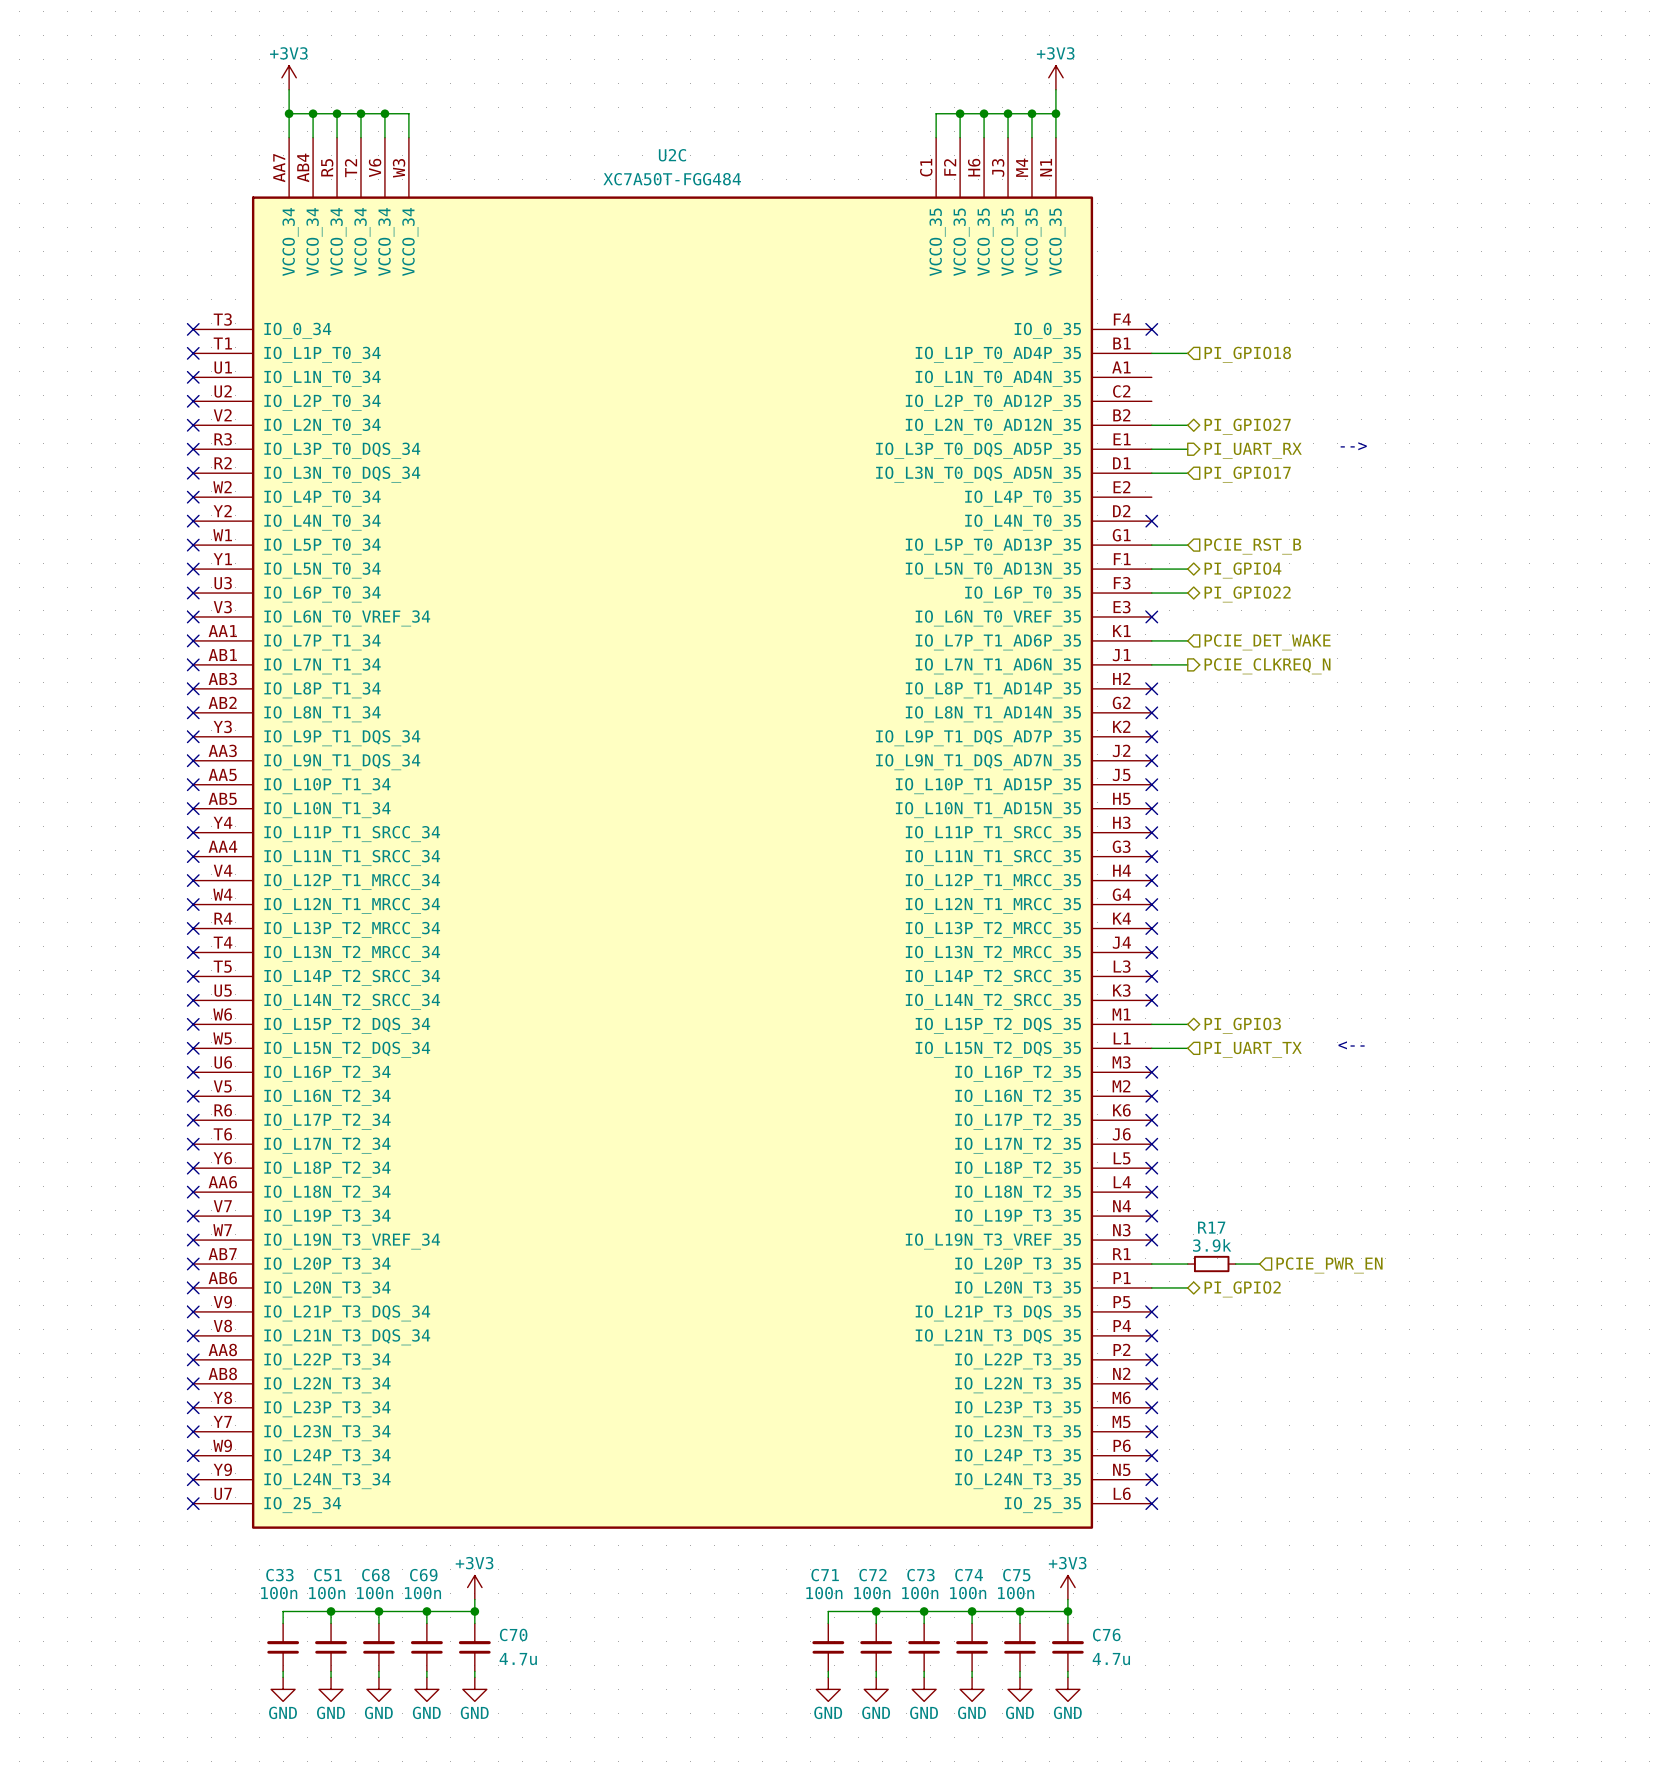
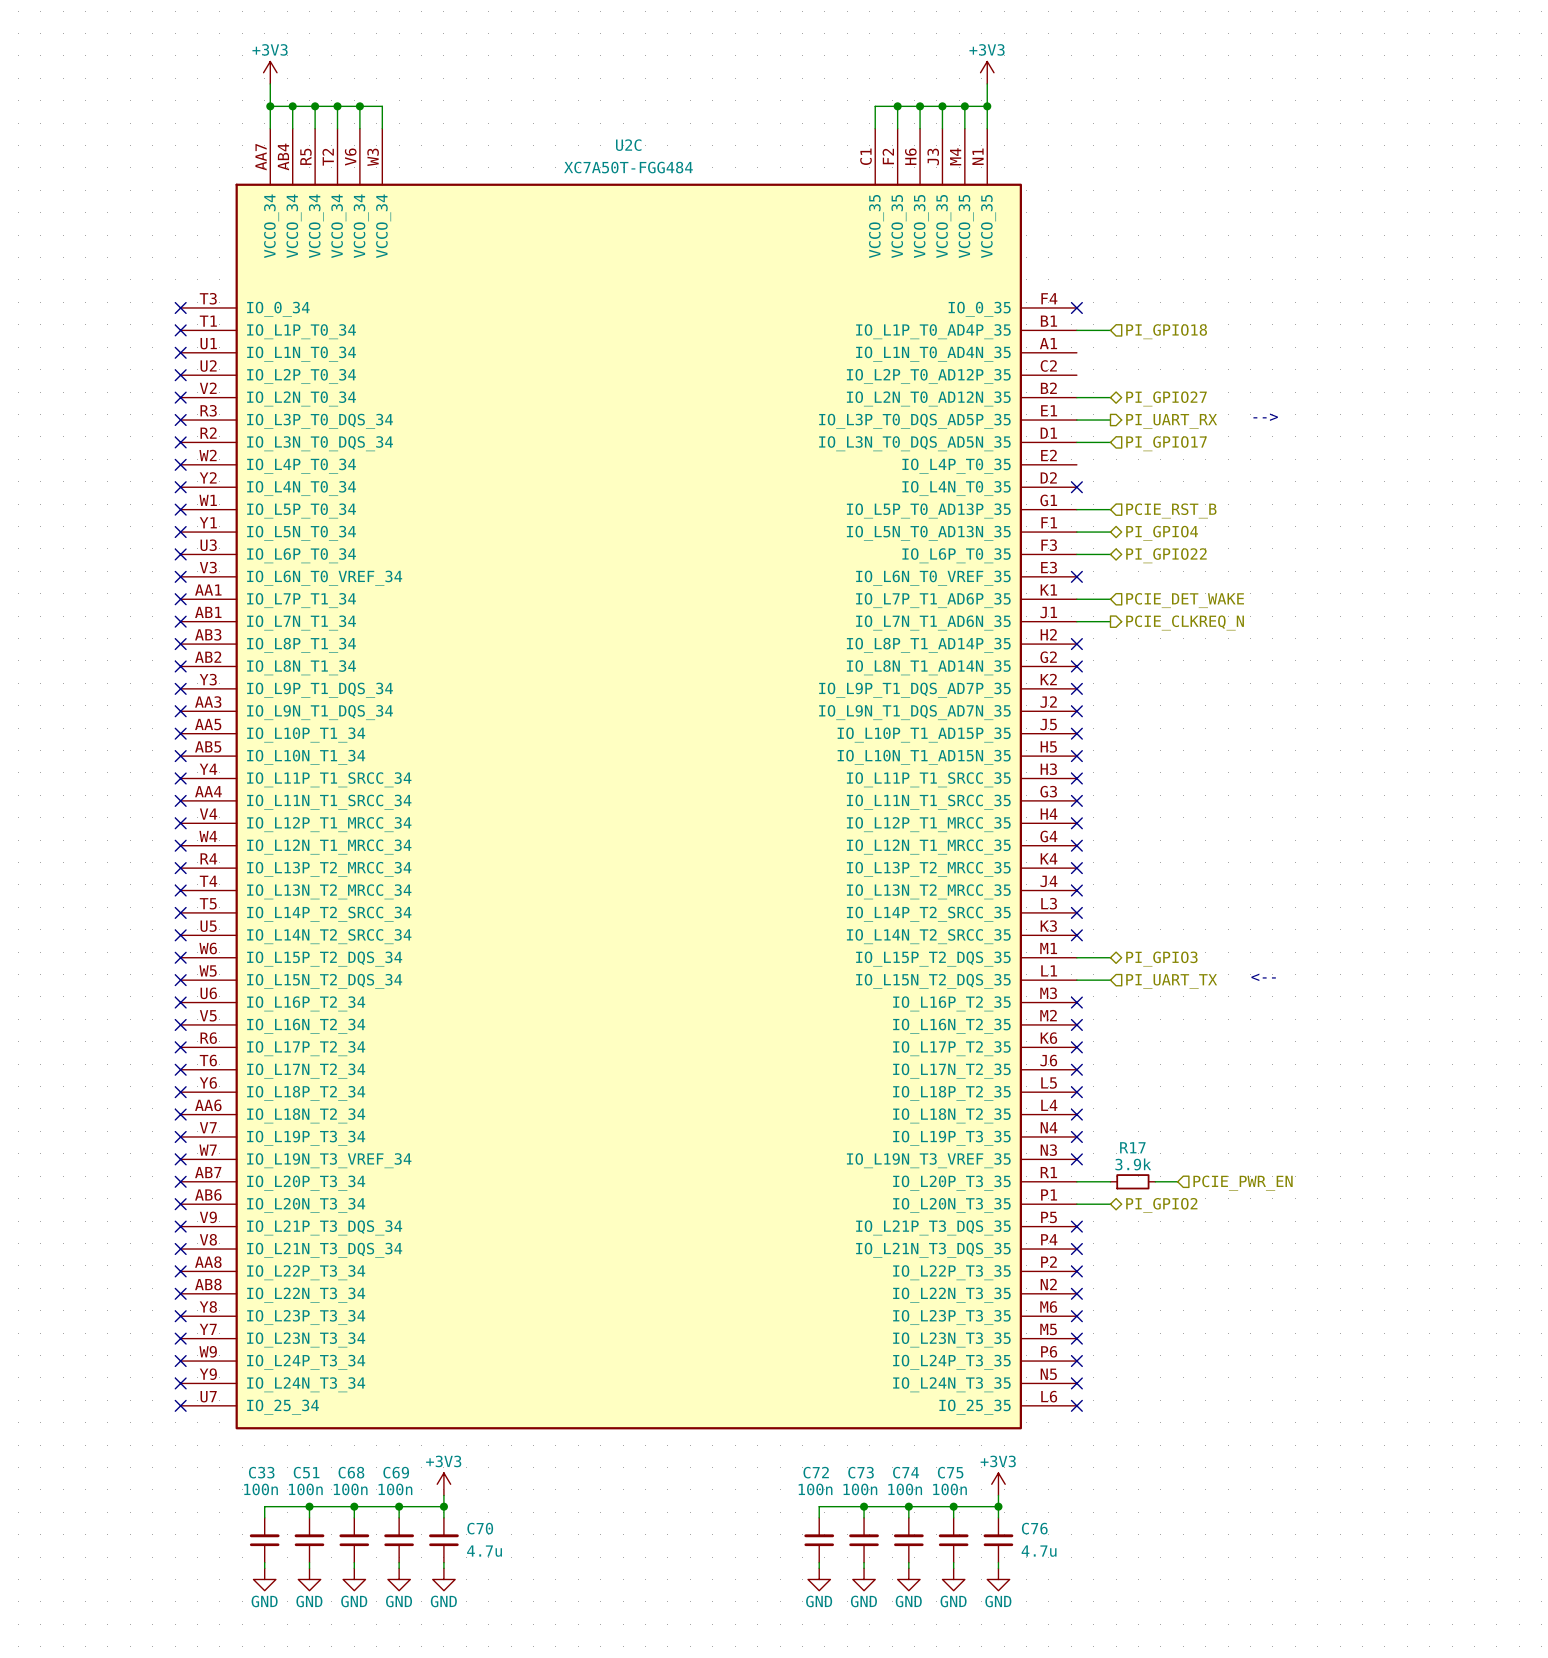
wire: (876, 1611) (828, 1611) (828, 1623) -> none
junction: (876, 1611) -> none
C71: 100n (828, 1647) -> none
wire: (828, 1671) (828, 1677) -> none
power symbol: GND (828, 1689) -> none

